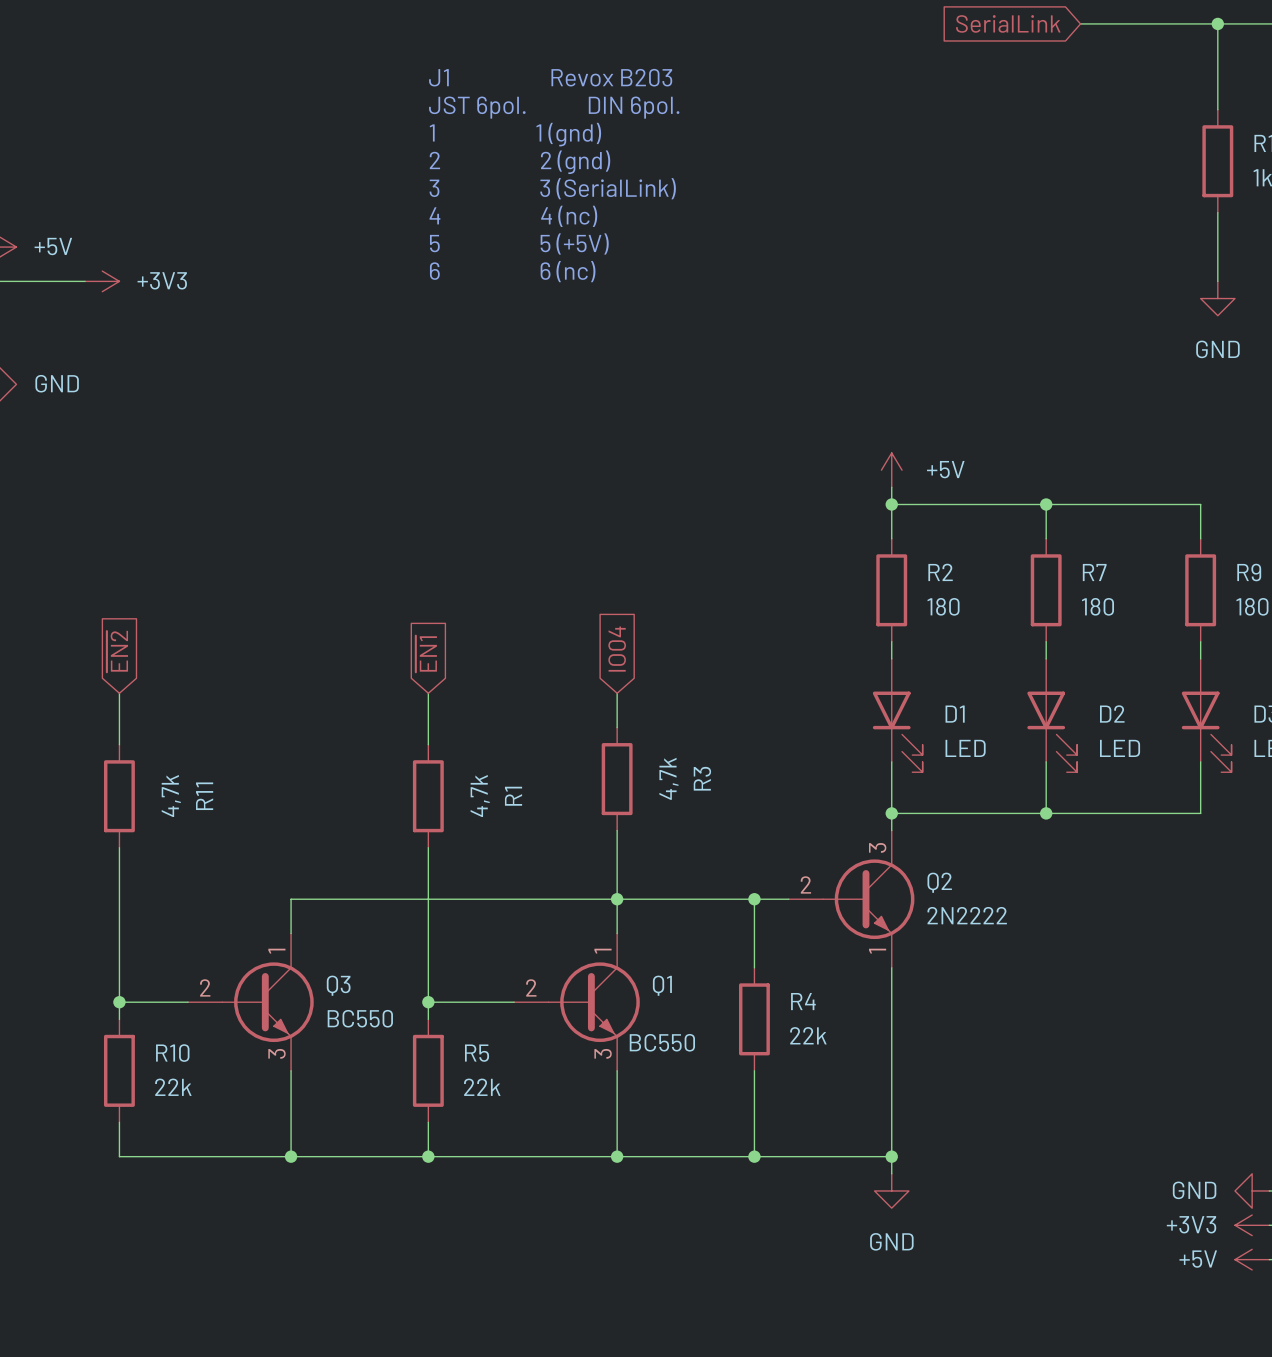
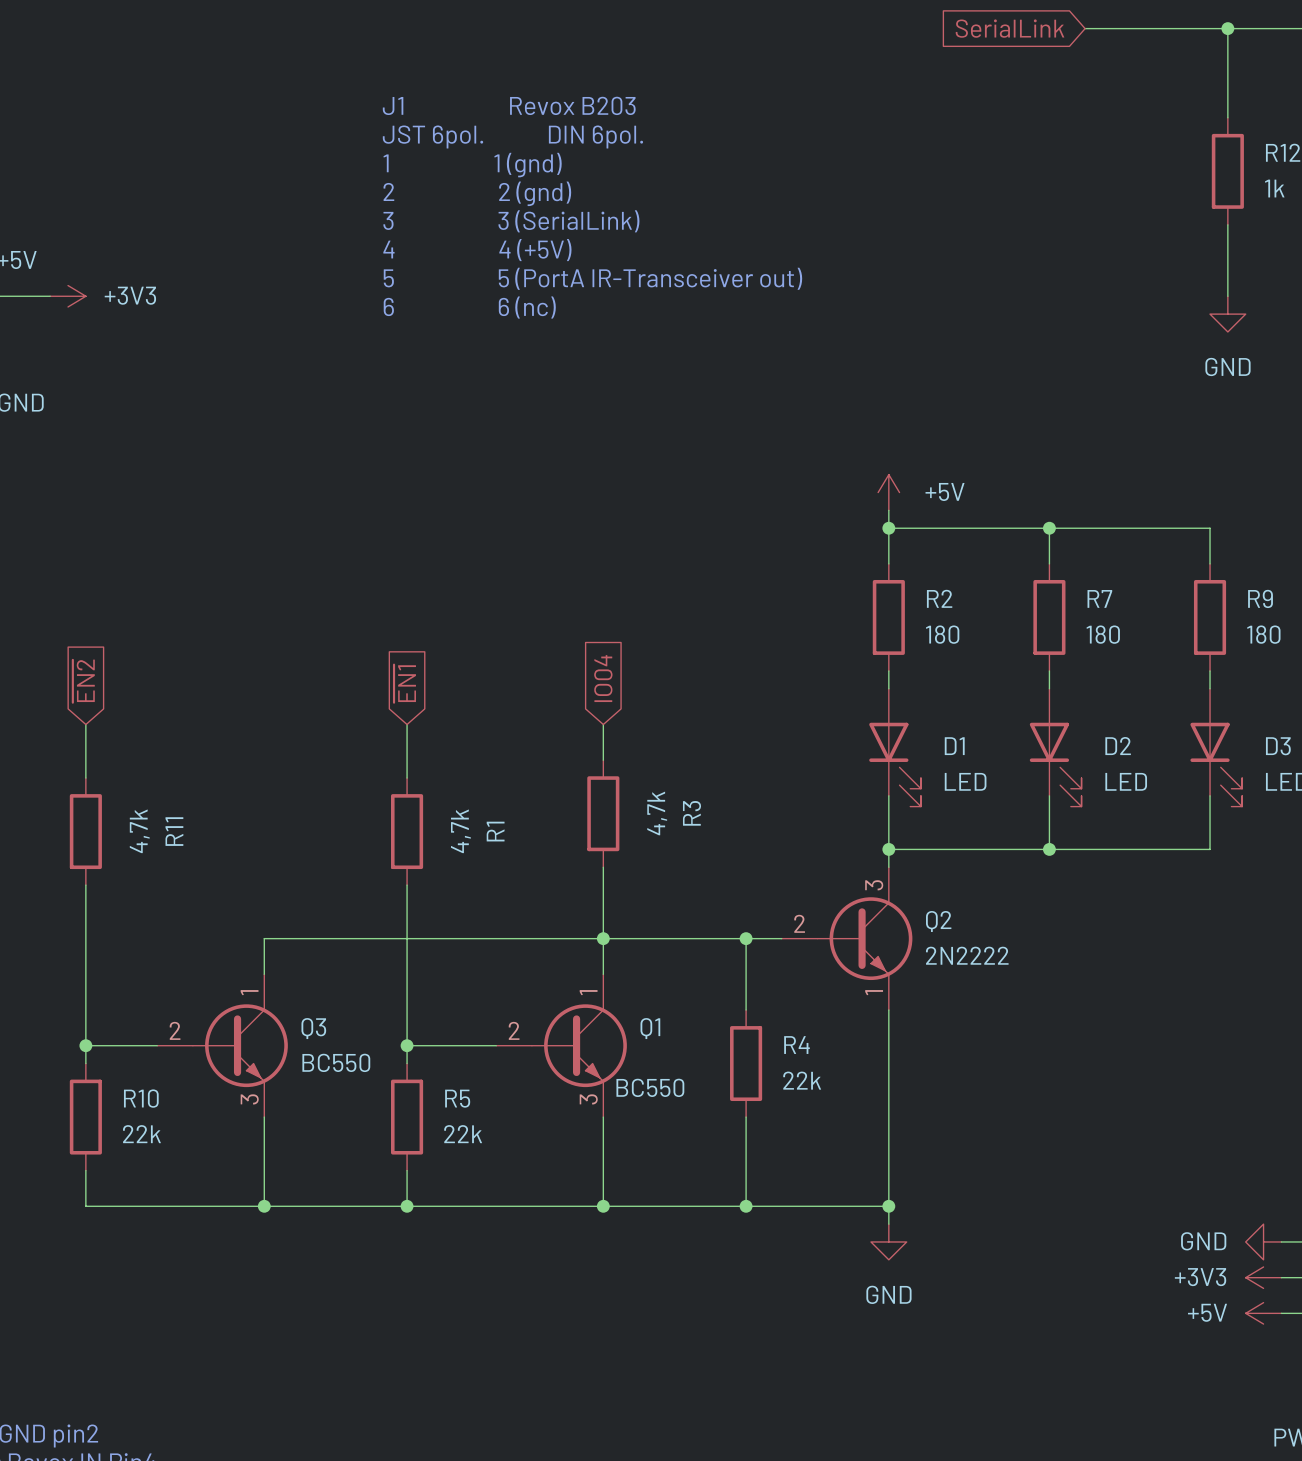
text position: J1 Revox B203 (550, 77) -> J1 Revox B203 (509, 105)
text position: JST 6pol. DIN 6pol. (554, 107) -> JST 6pol. DIN 6pol. (512, 136)
text position: 1 1 (gnd) (515, 134) -> 1 1 (gnd) (472, 165)
text position: 2 2 (gnd) (519, 162) -> 2 2 (gnd) (477, 193)
text position: 3 3 (SerialLink) (552, 188) -> 3 3 (SerialLink) (511, 221)
text: 4 4 (nc) (513, 216) -> none
text: none -> 4 4 (+5V) (477, 250)
text: 5 5 (+5V) (519, 243) -> none
text: none -> 5 5 (PortA IR-Transceiver out) (592, 278)
text position: 6 6 (nc) (512, 271) -> 6 6 (nc) (469, 307)

